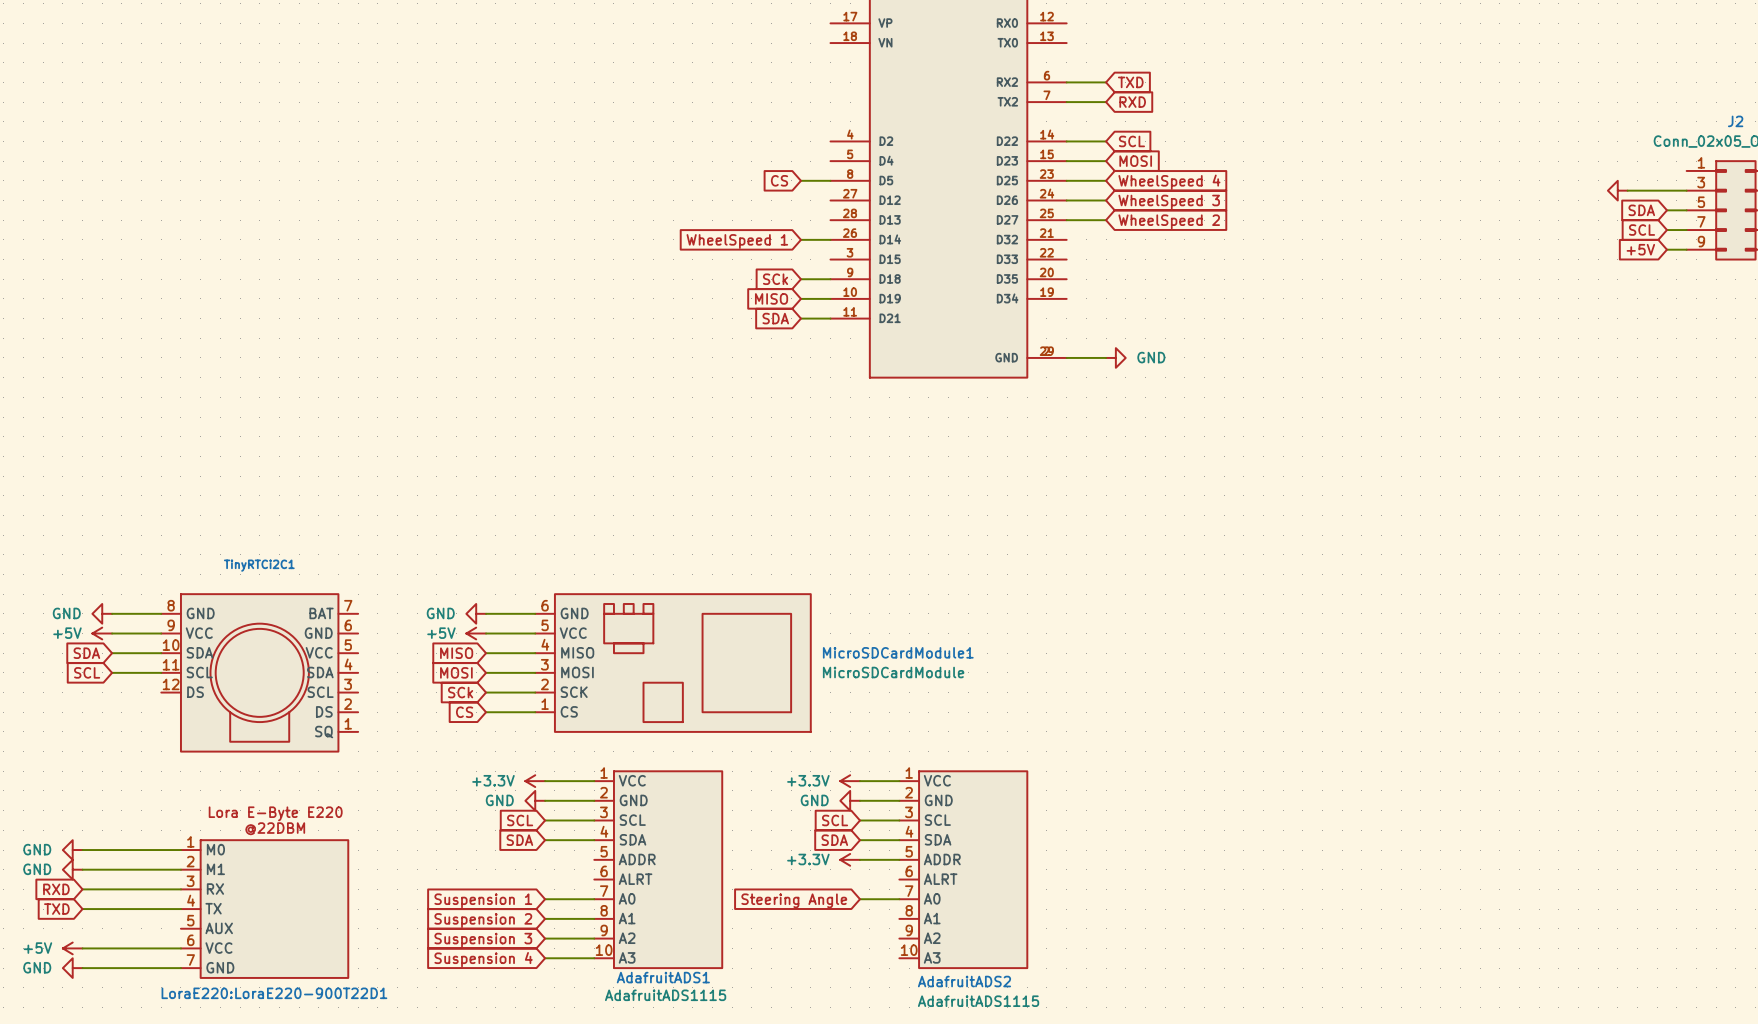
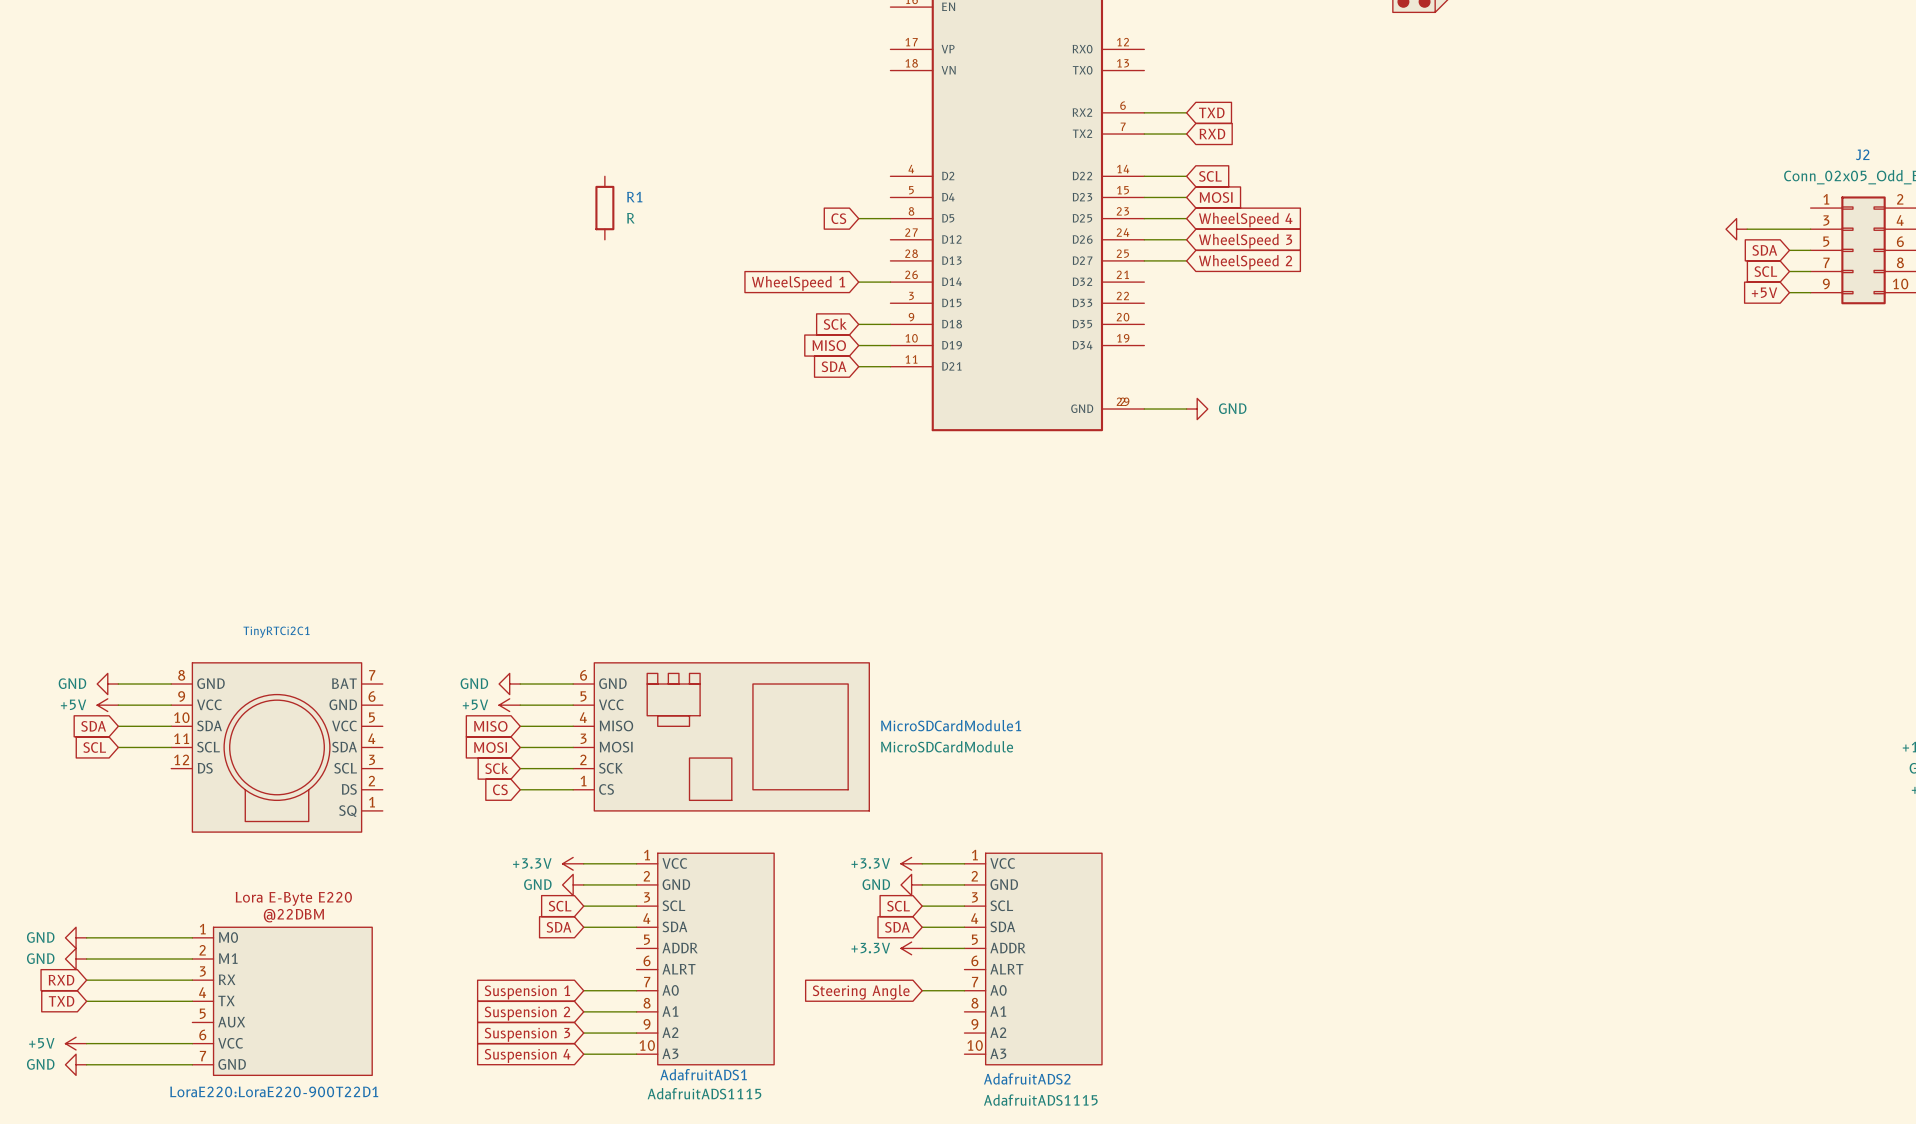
R1: none -> R (604, 208)

